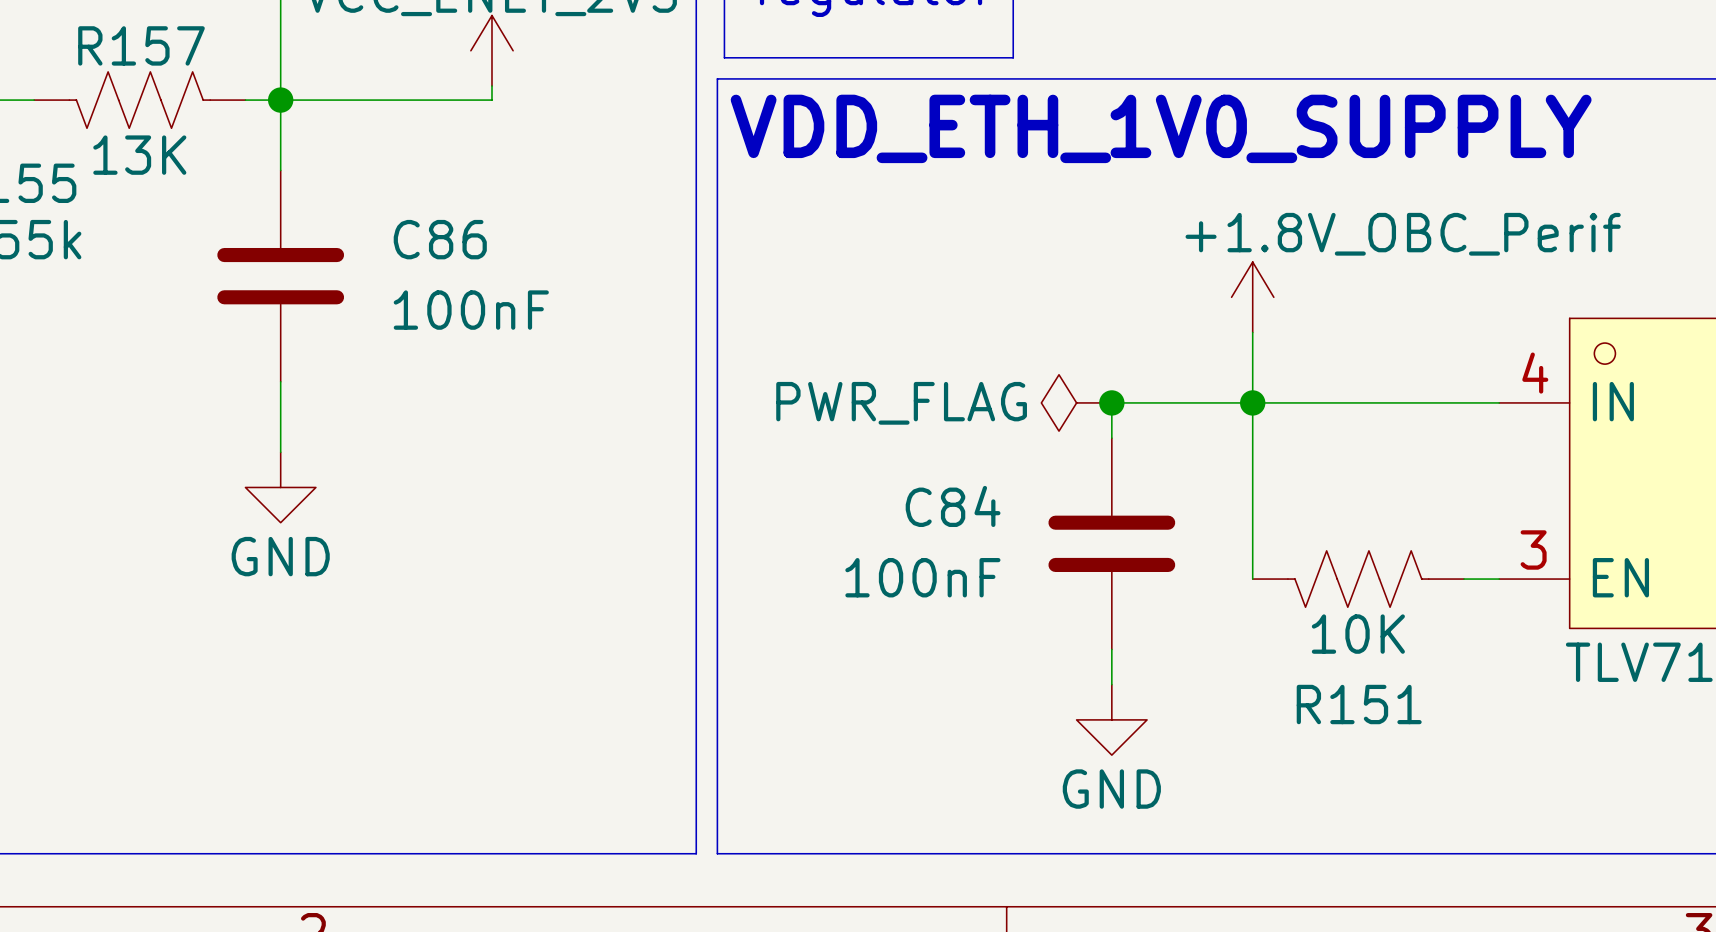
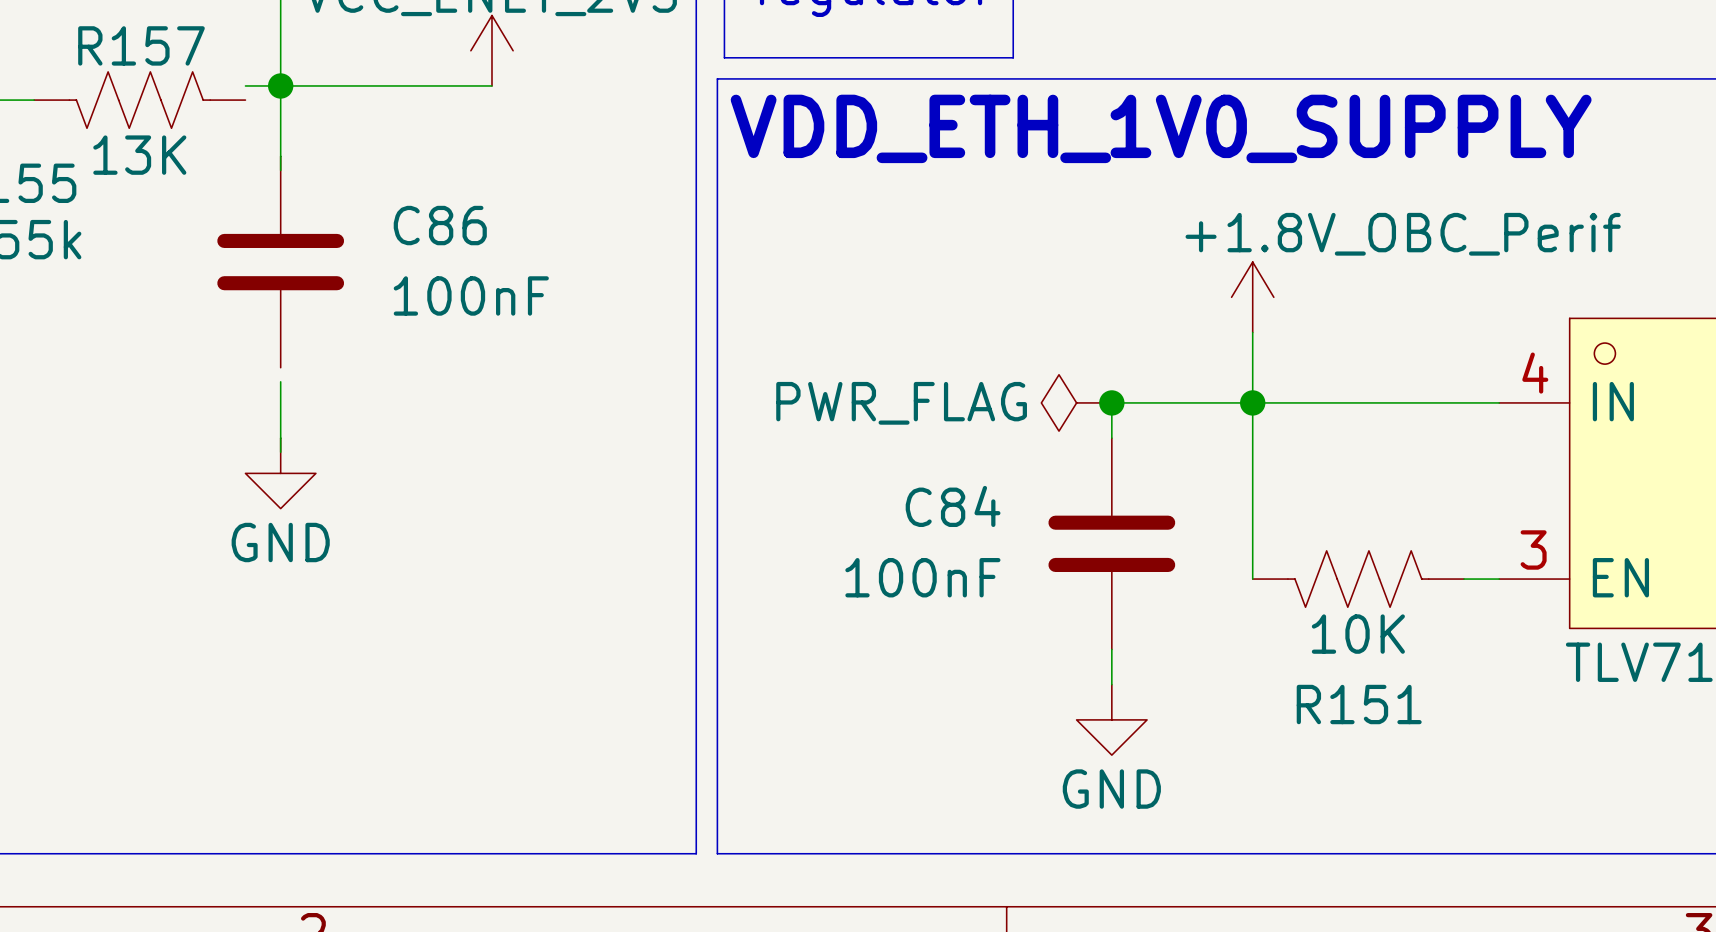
wire: (491, 85) (491, 100) (245, 100) -> (491, 85) (245, 85)
junction position: (280, 100) -> (280, 85)
C86 position: (280, 276) -> (280, 262)
power symbol position: GND (280, 487) -> GND (280, 473)

